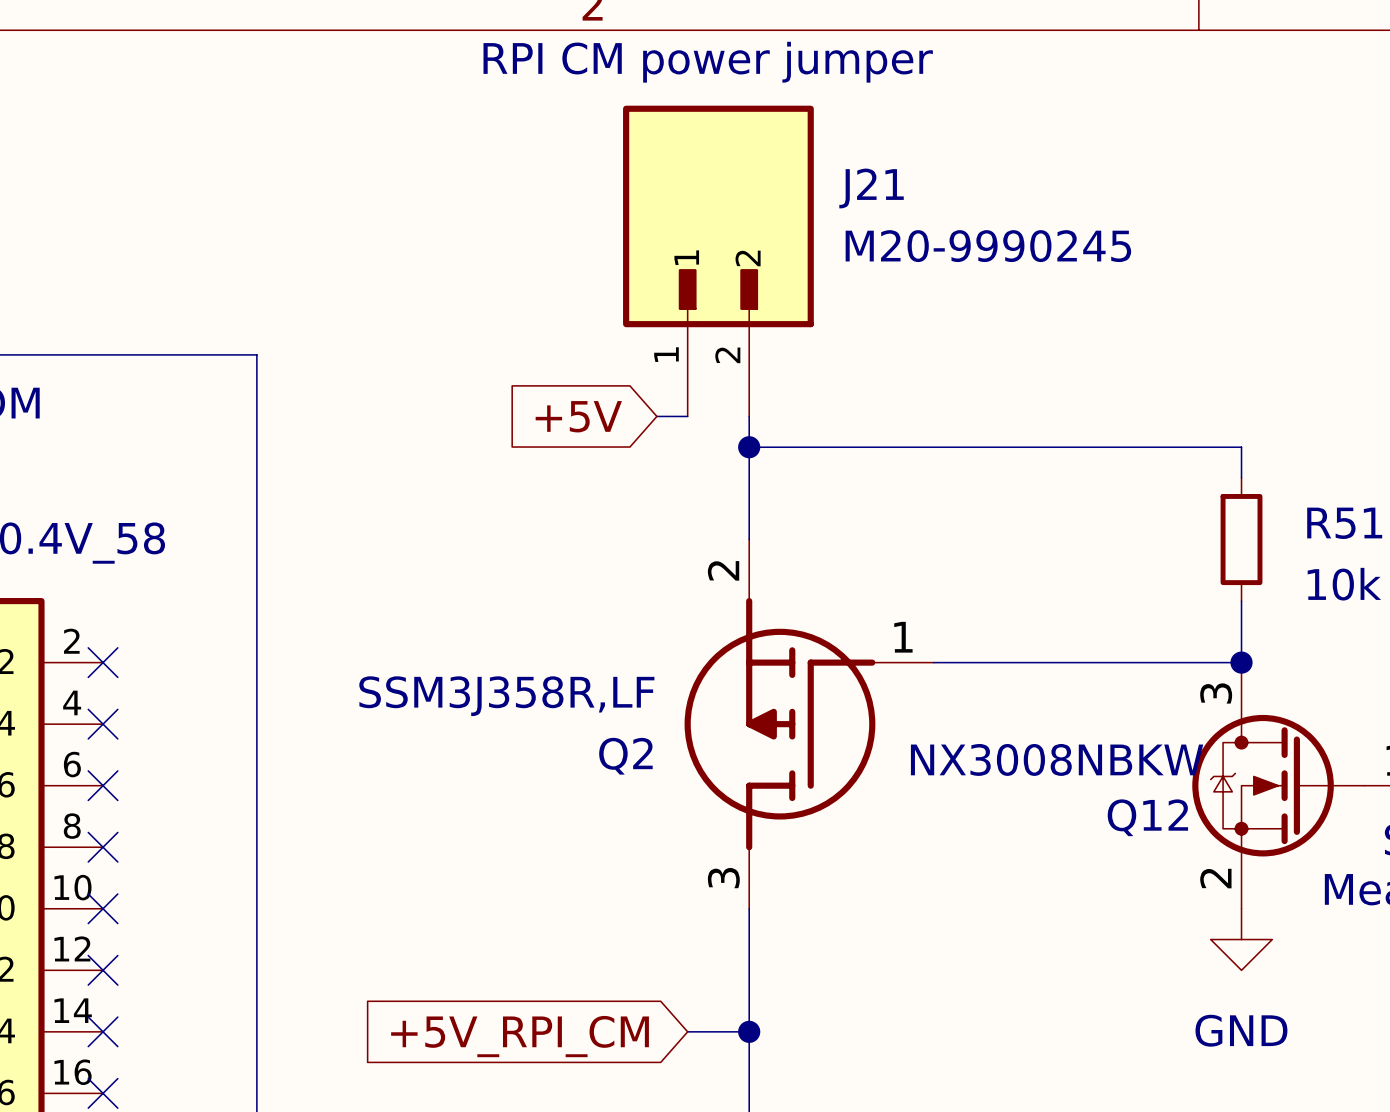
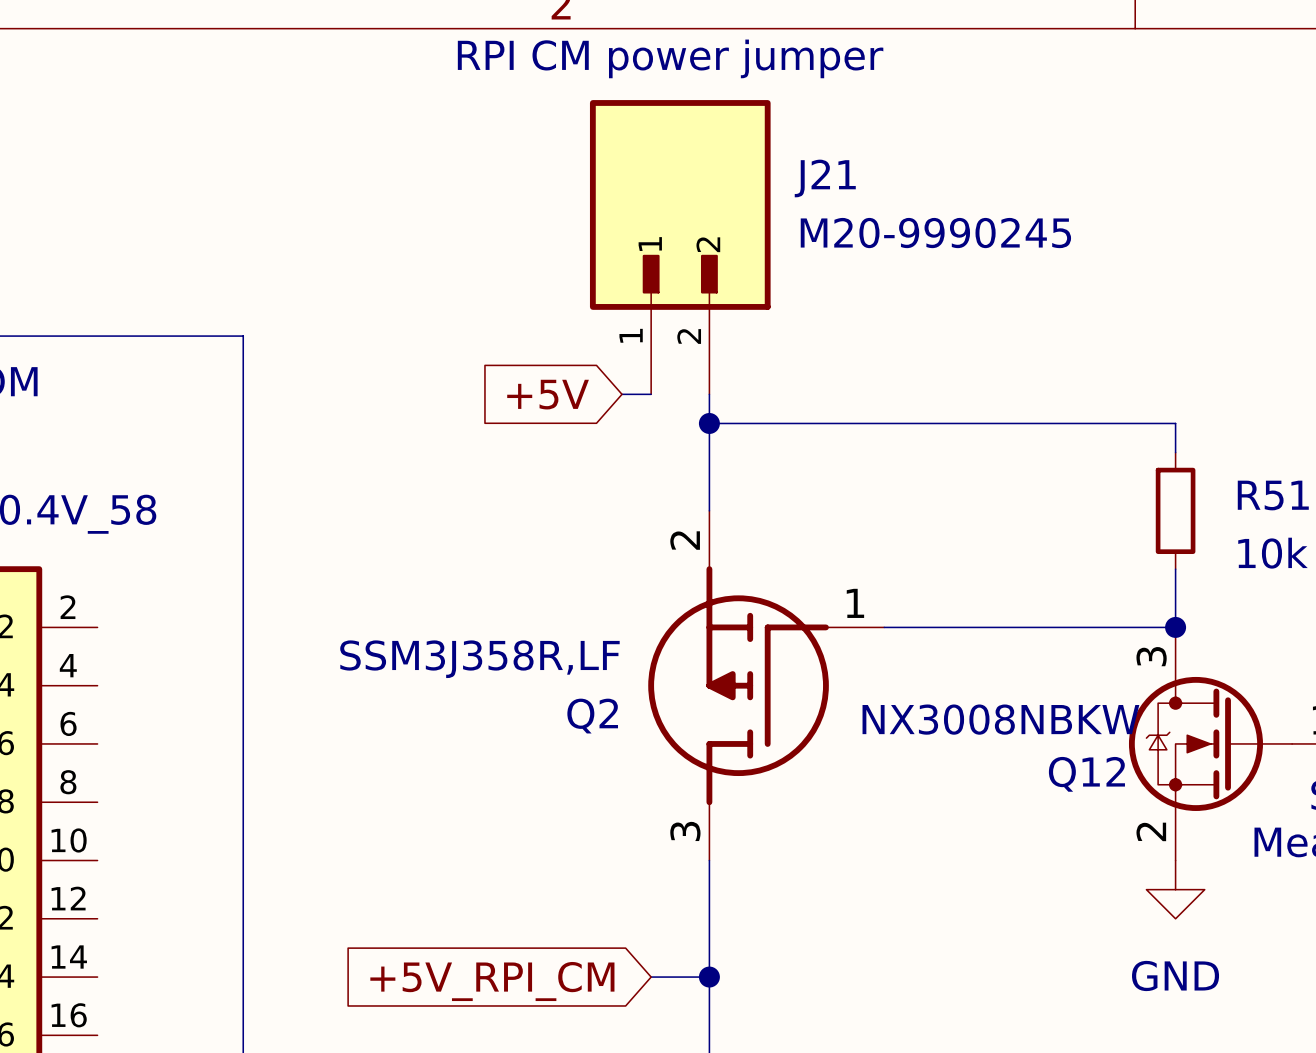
no-connect mark: (103, 662) -> none
no-connect mark: (103, 724) -> none
no-connect mark: (103, 785) -> none
no-connect mark: (103, 847) -> none
no-connect mark: (103, 908) -> none
no-connect mark: (103, 970) -> none
no-connect mark: (103, 1031) -> none
no-connect mark: (103, 1093) -> none

